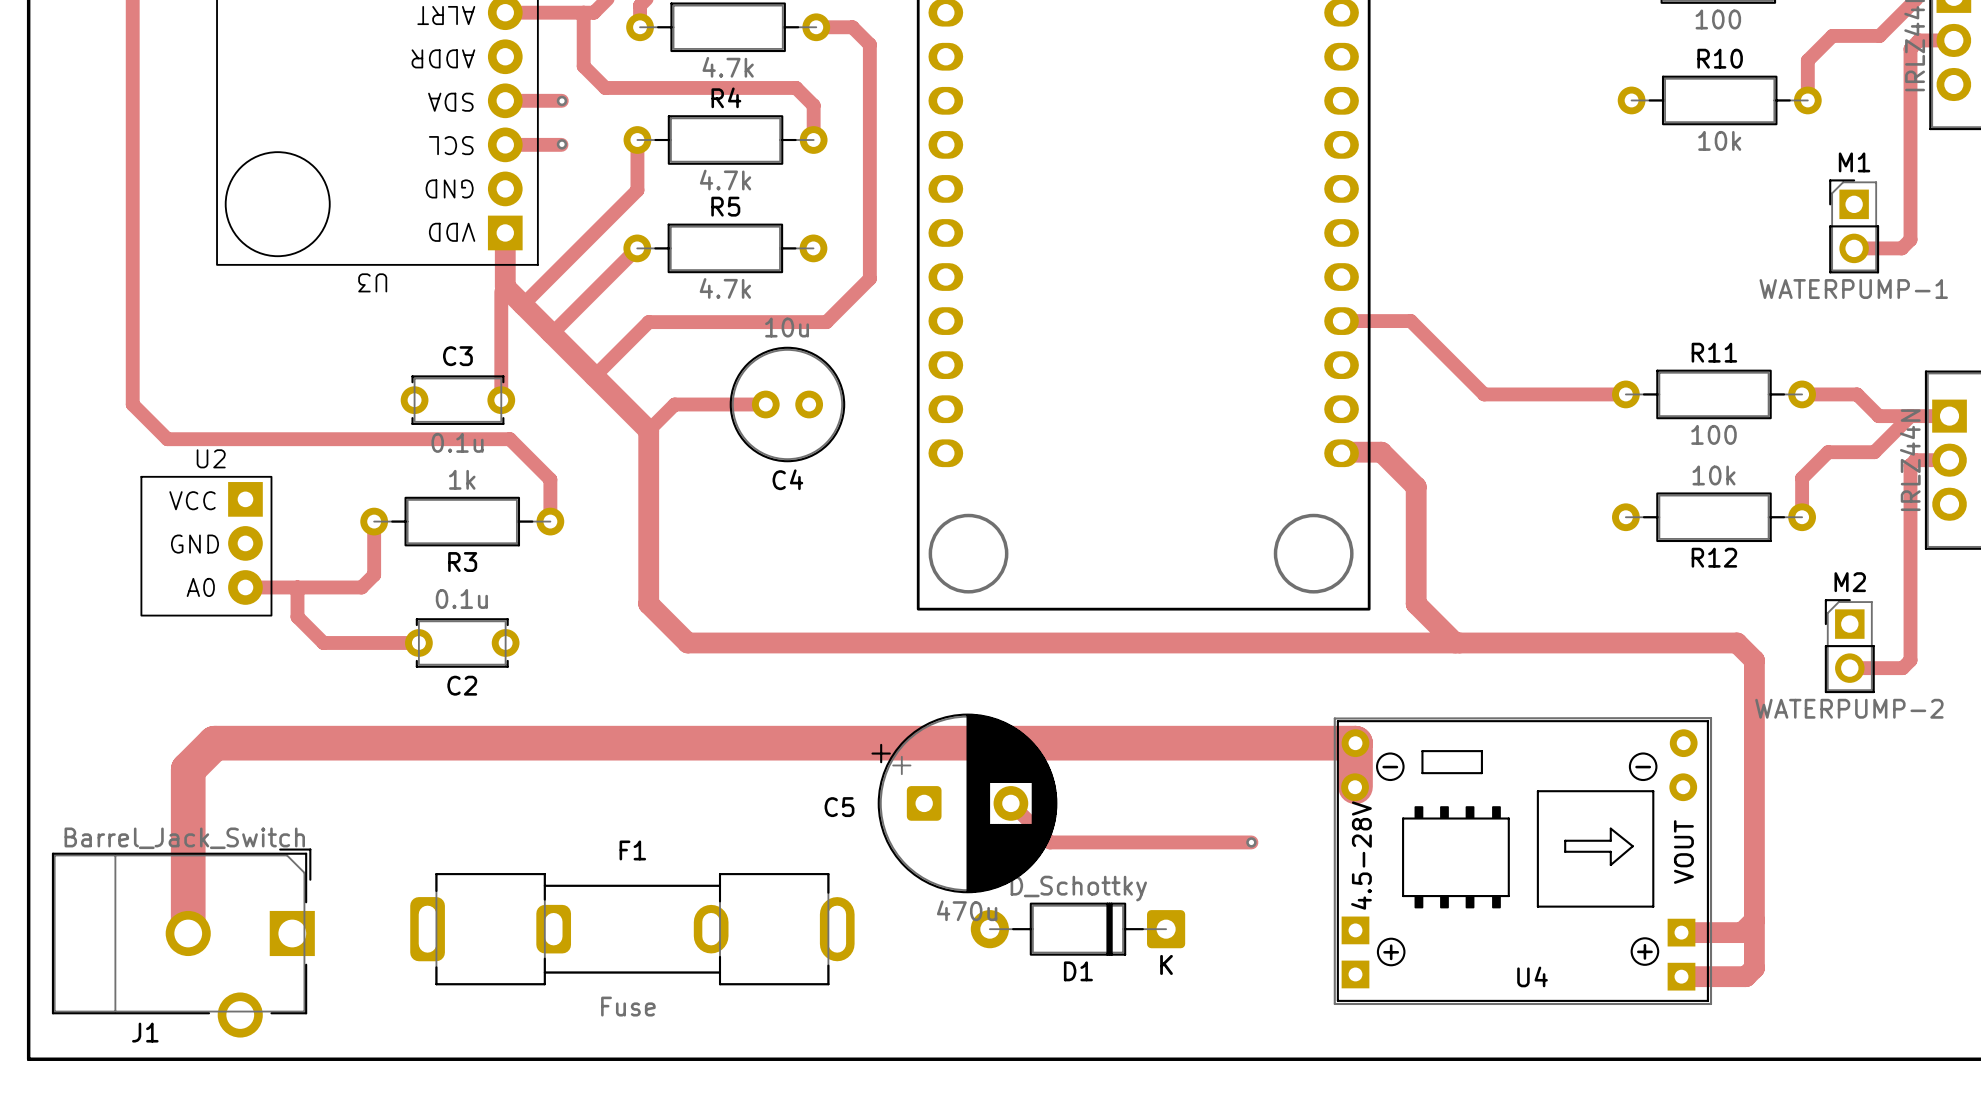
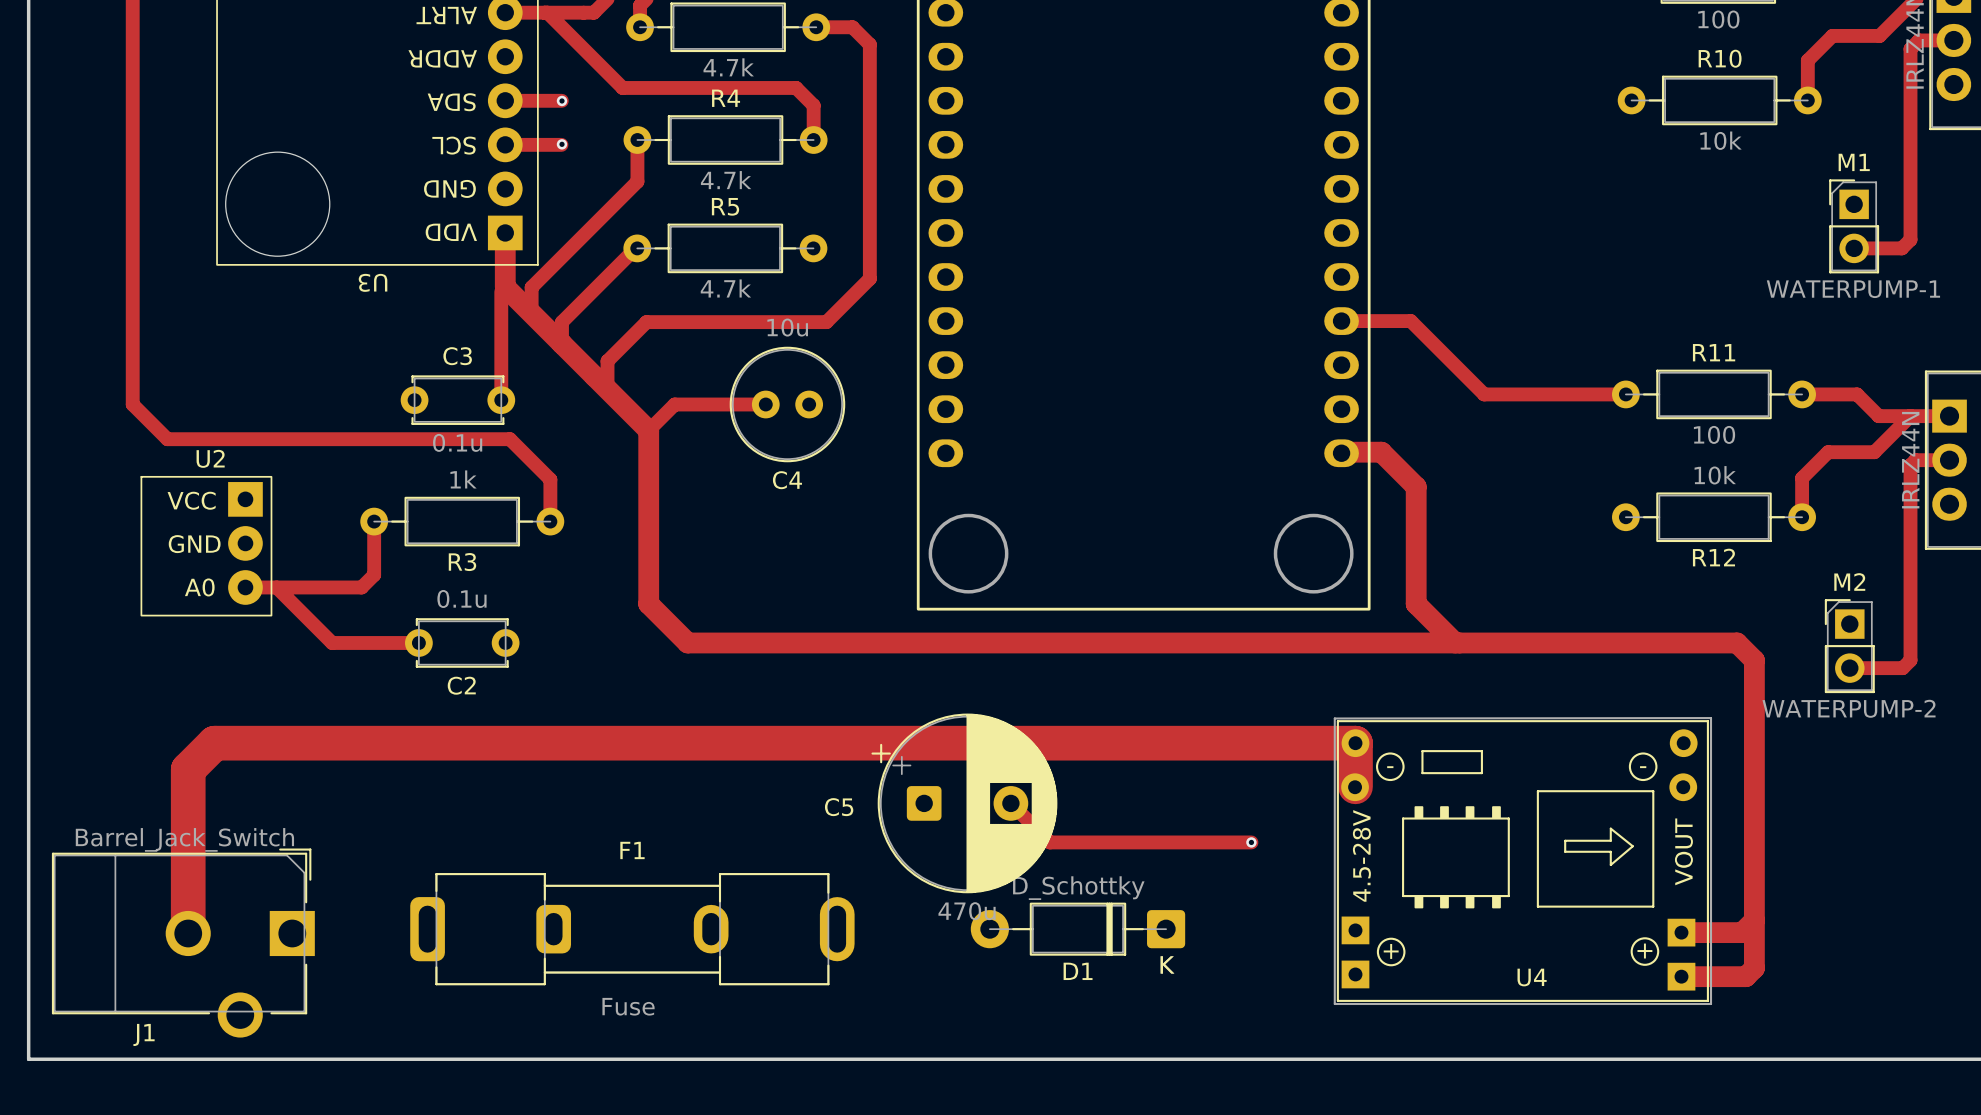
track: (583, 12) (583, 66) (605, 87) (622, 87) -> (547, 12) (622, 87)
track: (637, 181) (637, 190) (522, 304) -> (637, 181) (531, 287) (531, 313)
track: (637, 248) (551, 332) -> (637, 248) (561, 322) (561, 343)
track: (648, 322) (594, 376) -> (648, 322) (607, 361) (607, 384) (614, 391) (609, 391)
track: (297, 587) (297, 616) (323, 642) (332, 642) -> (276, 587) (332, 642)

